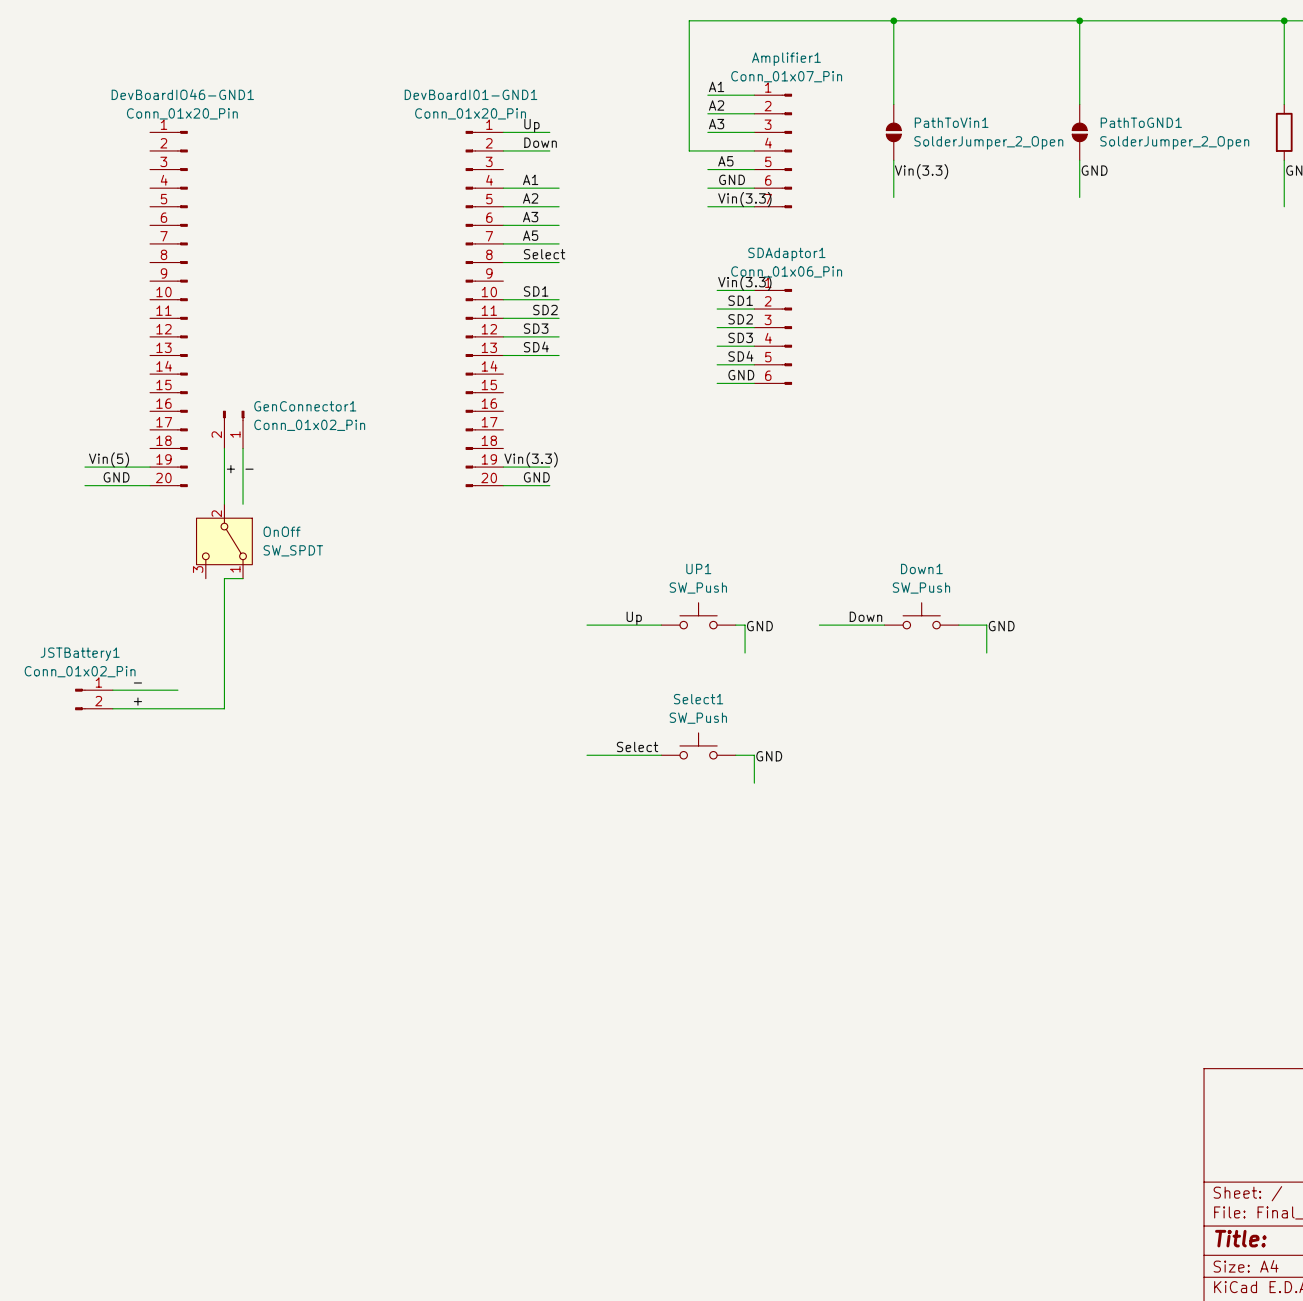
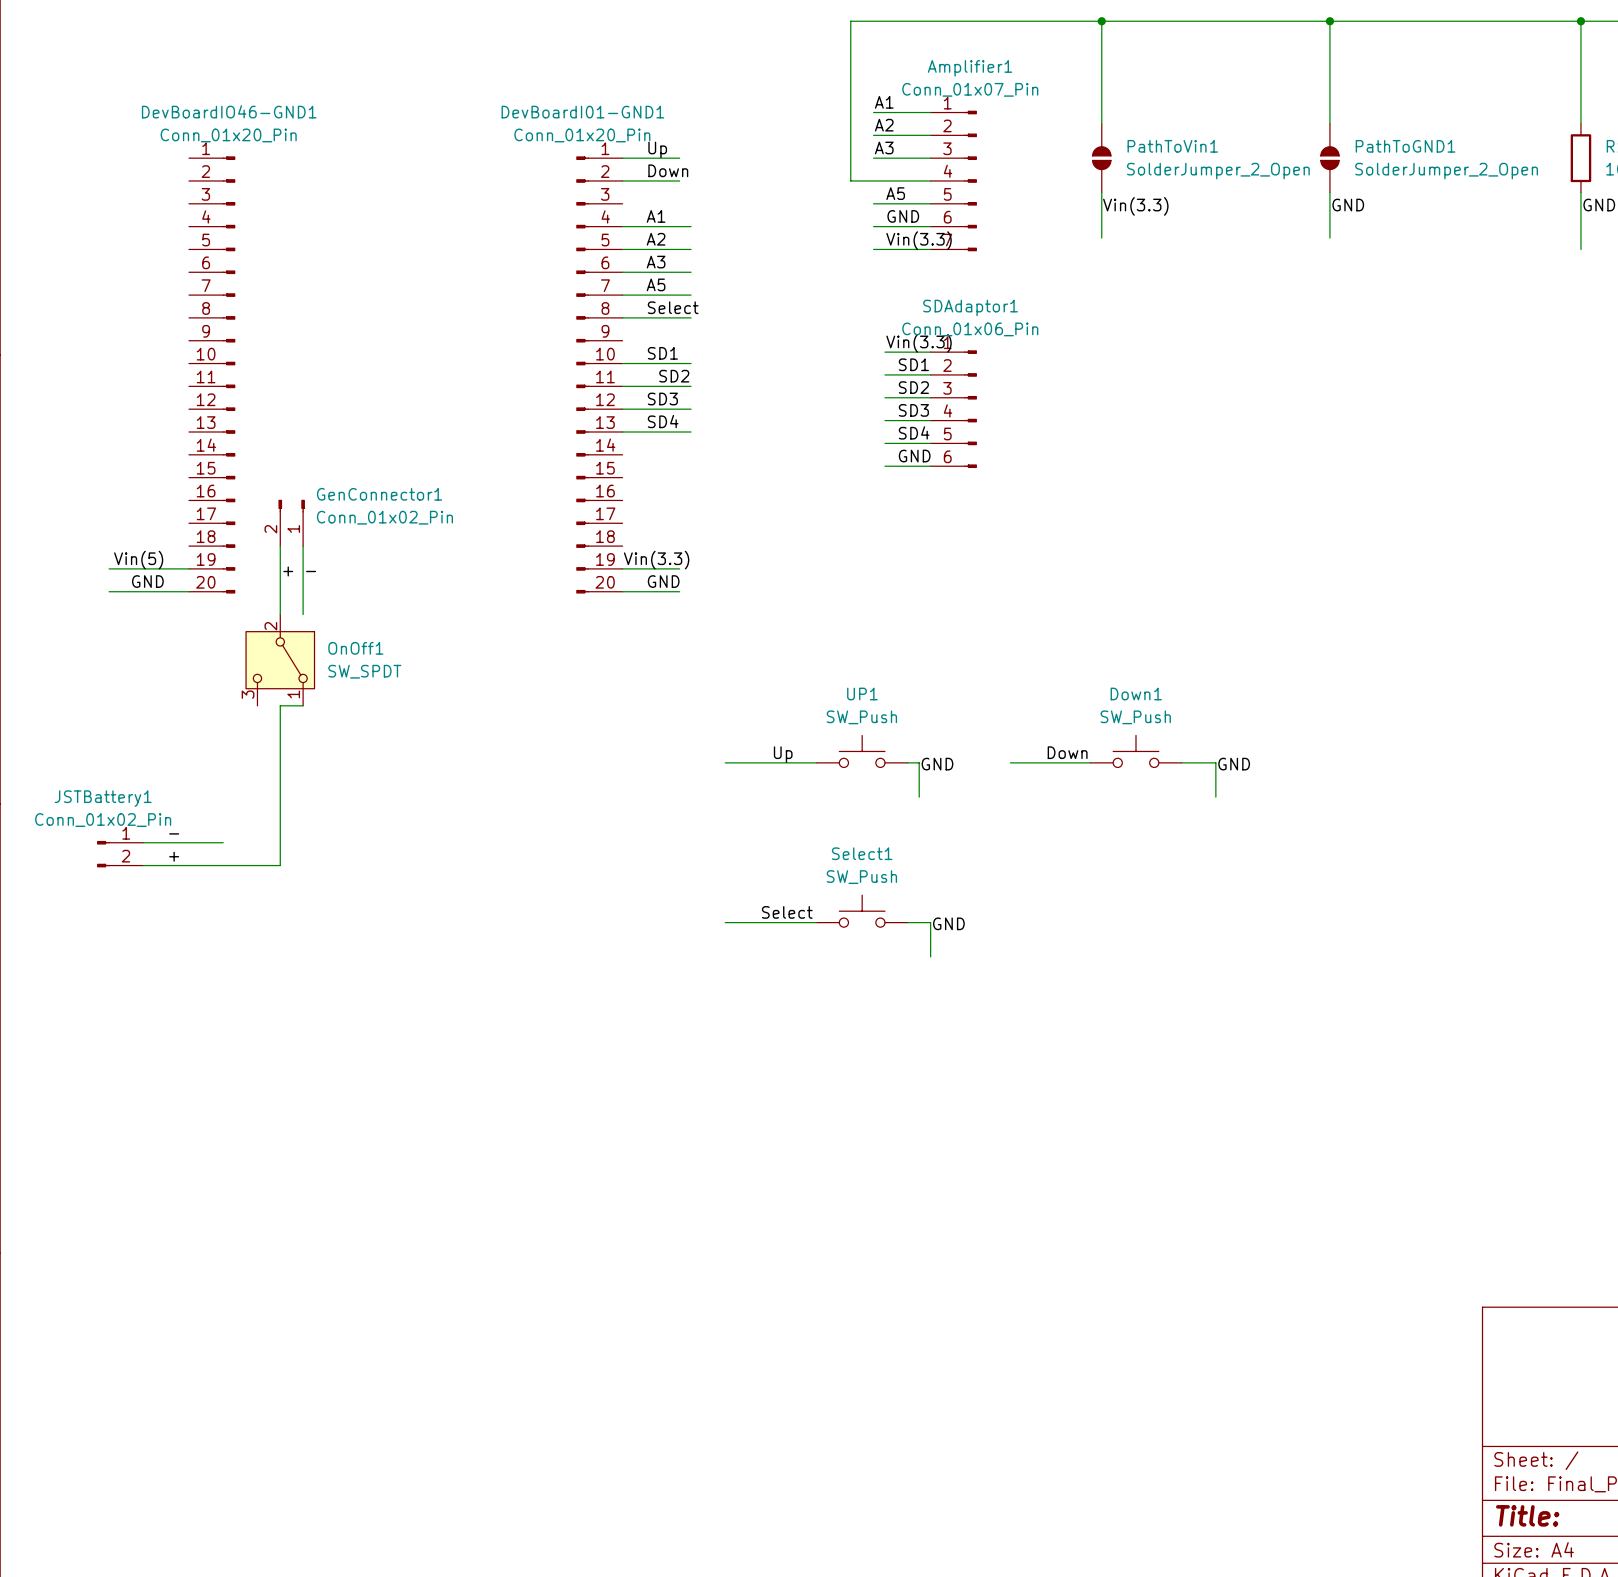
OnOff name: OnOff (282, 531) -> OnOff1 (355, 648)

